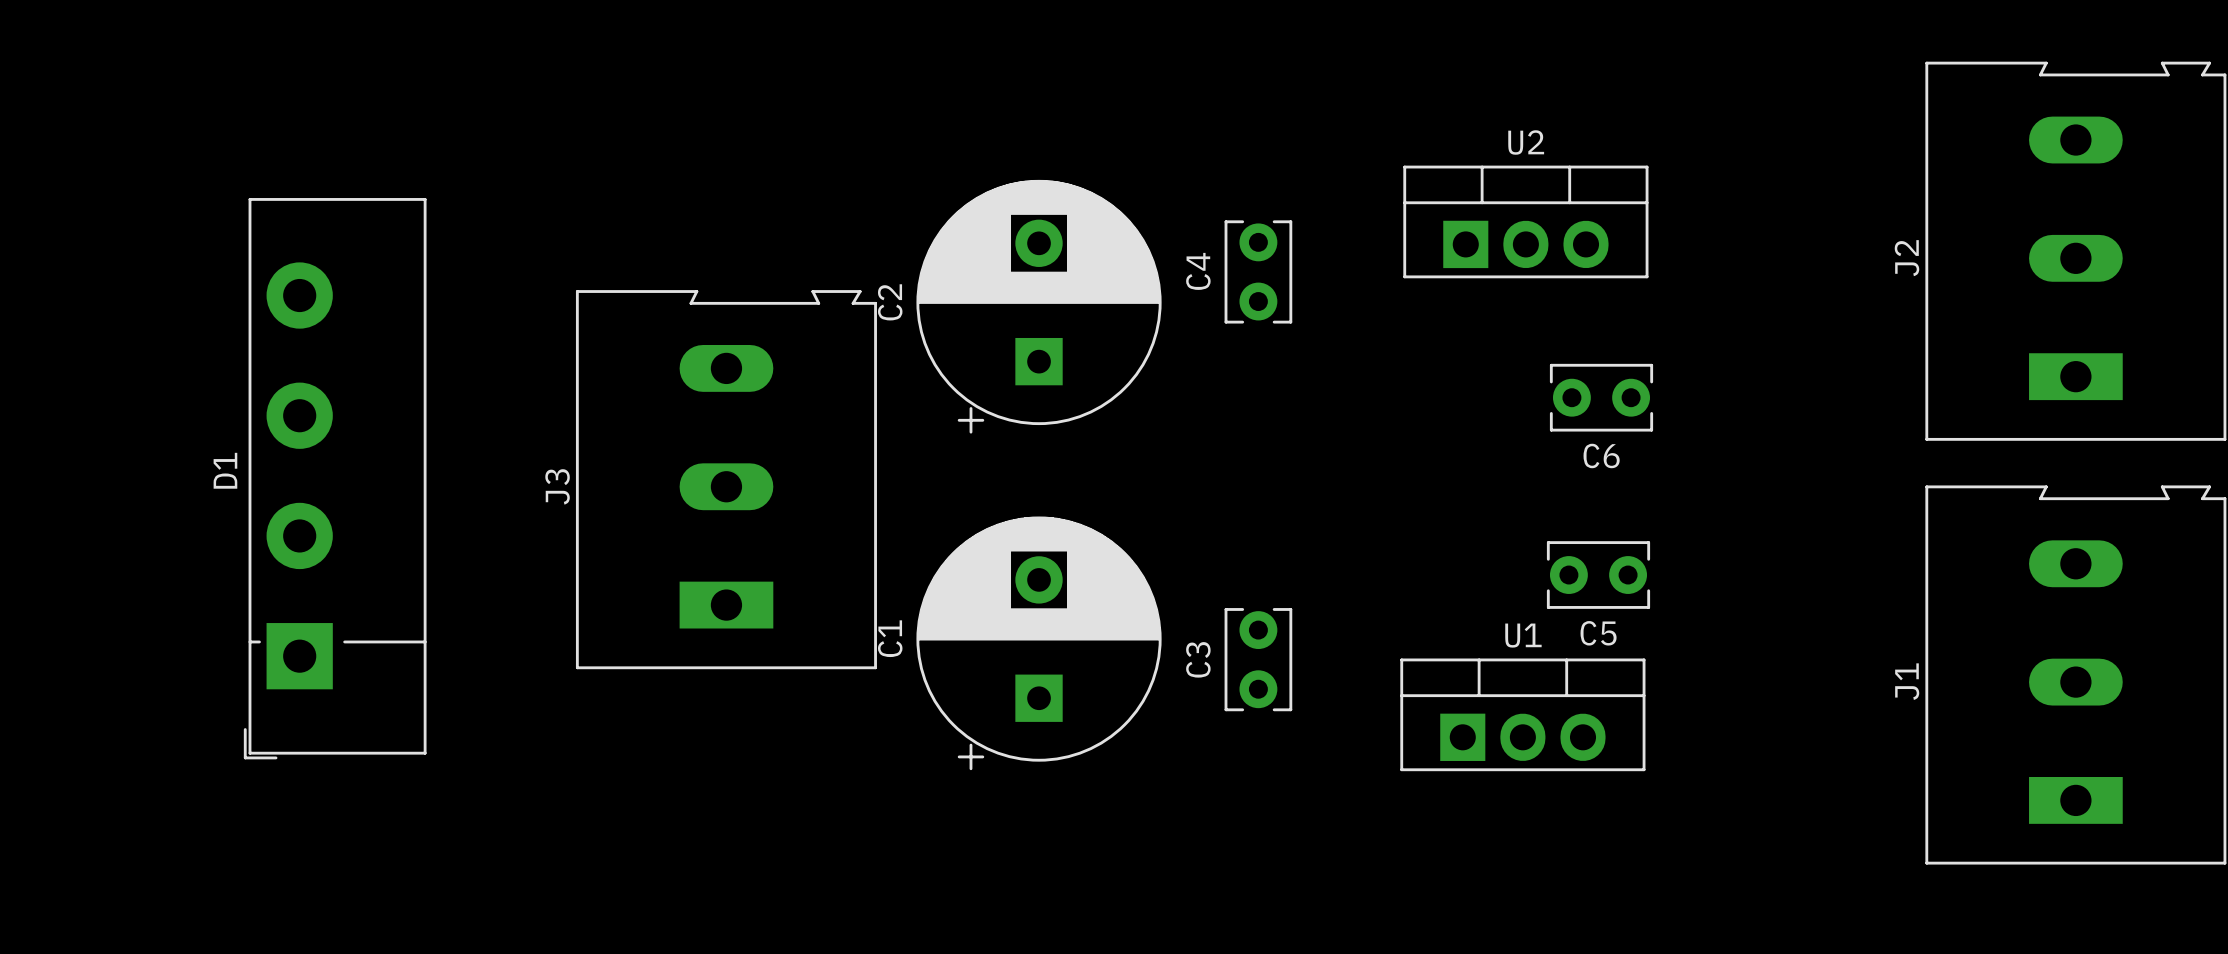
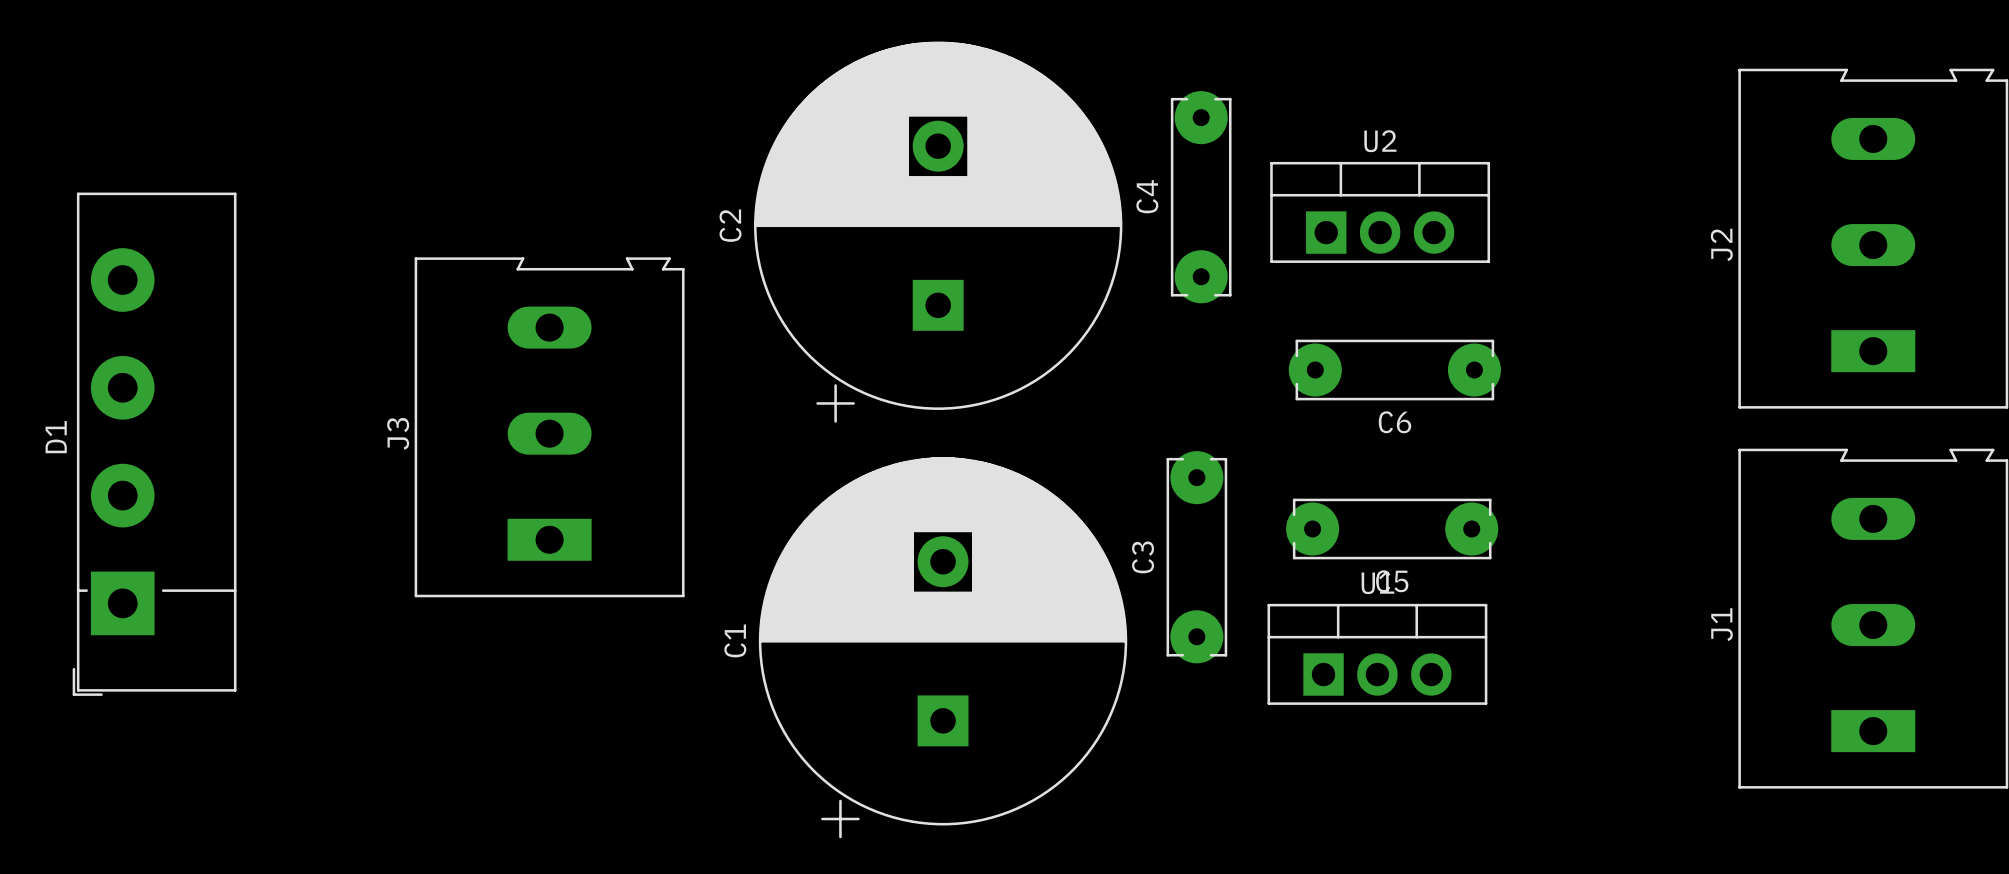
C2 footprint: [916, 179, 1162, 434] -> [754, 41, 1123, 423]
D1 footprint: [243, 198, 427, 760] -> [72, 192, 237, 696]
C4 footprint: [1224, 220, 1293, 324] -> [1170, 91, 1232, 304]
C2 name position: C2 (890, 302) -> C2 (730, 225)
C6 footprint: [1549, 363, 1654, 432] -> [1288, 339, 1501, 401]
J3 position: (726, 479) -> (549, 427)
C1 footprint: [916, 516, 1162, 771] -> [758, 457, 1128, 839]
C5 footprint: [1546, 541, 1651, 609] -> [1286, 498, 1499, 560]
C3 footprint: [1224, 608, 1293, 712] -> [1166, 451, 1228, 664]
C1 name position: C1 (890, 638) -> C1 (735, 640)

